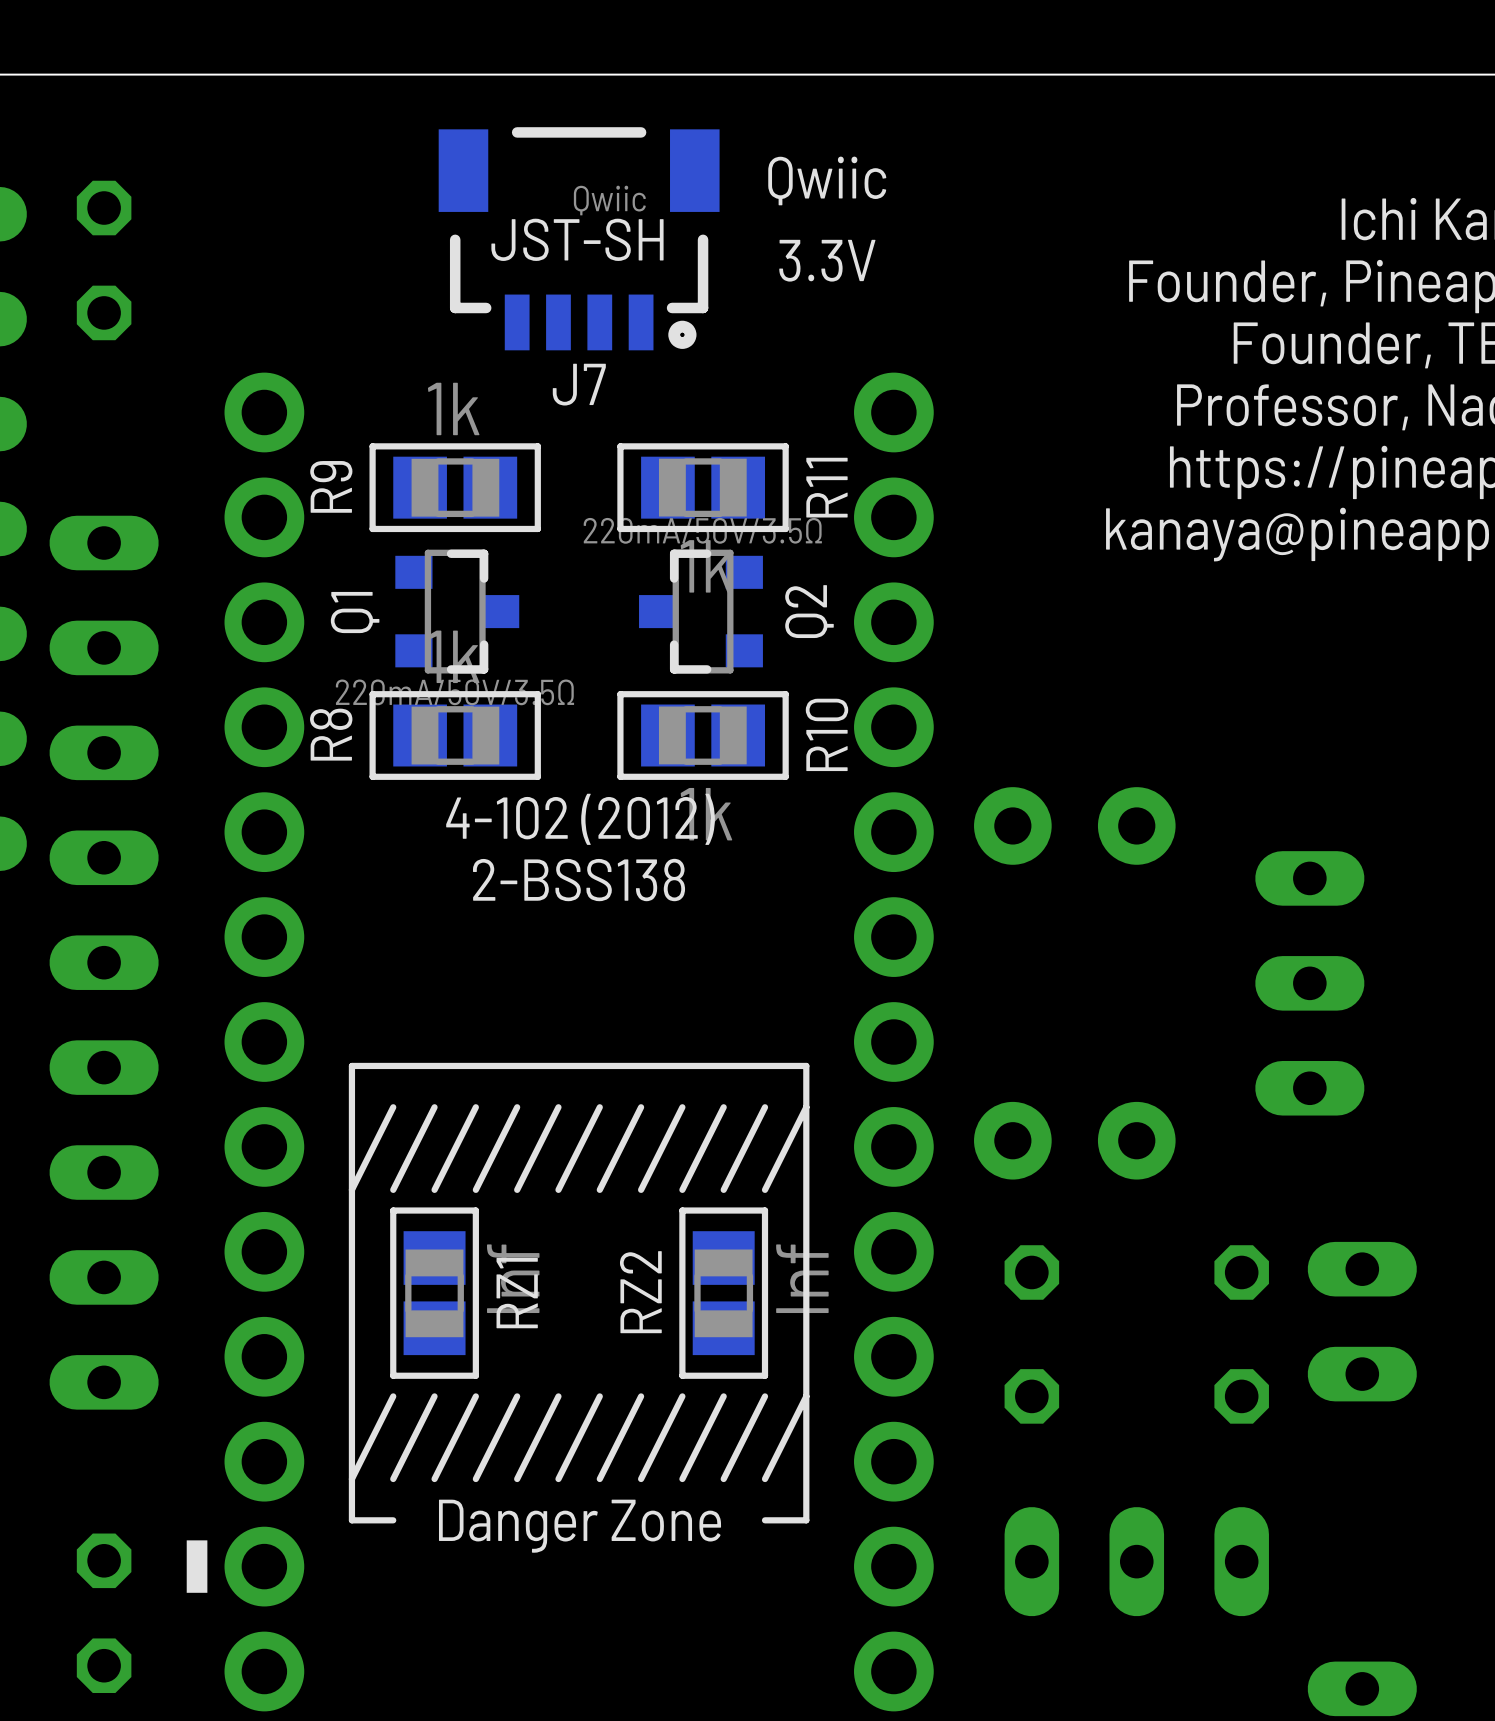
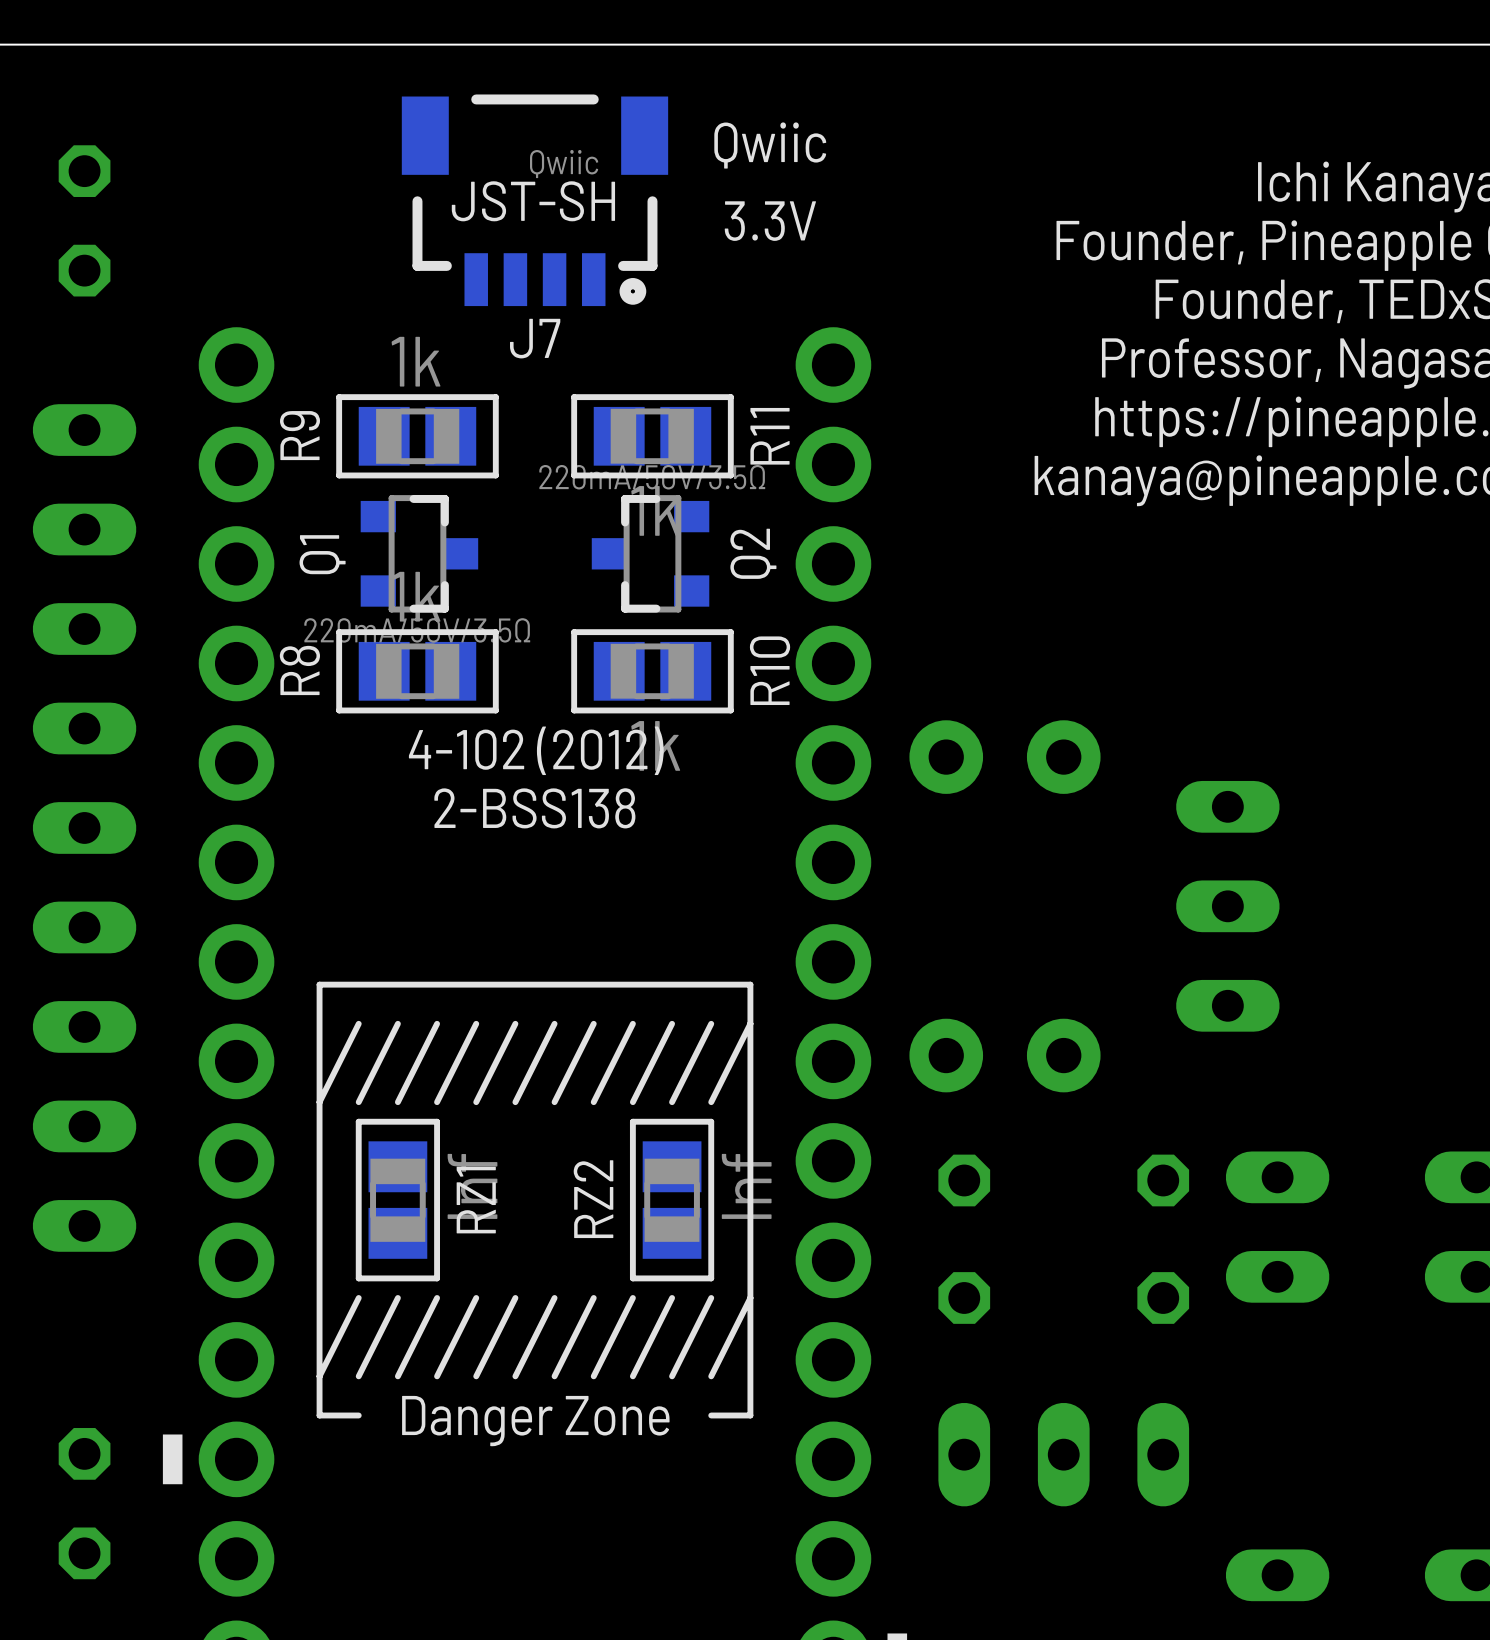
part position: (104, 962) -> (84, 827)

